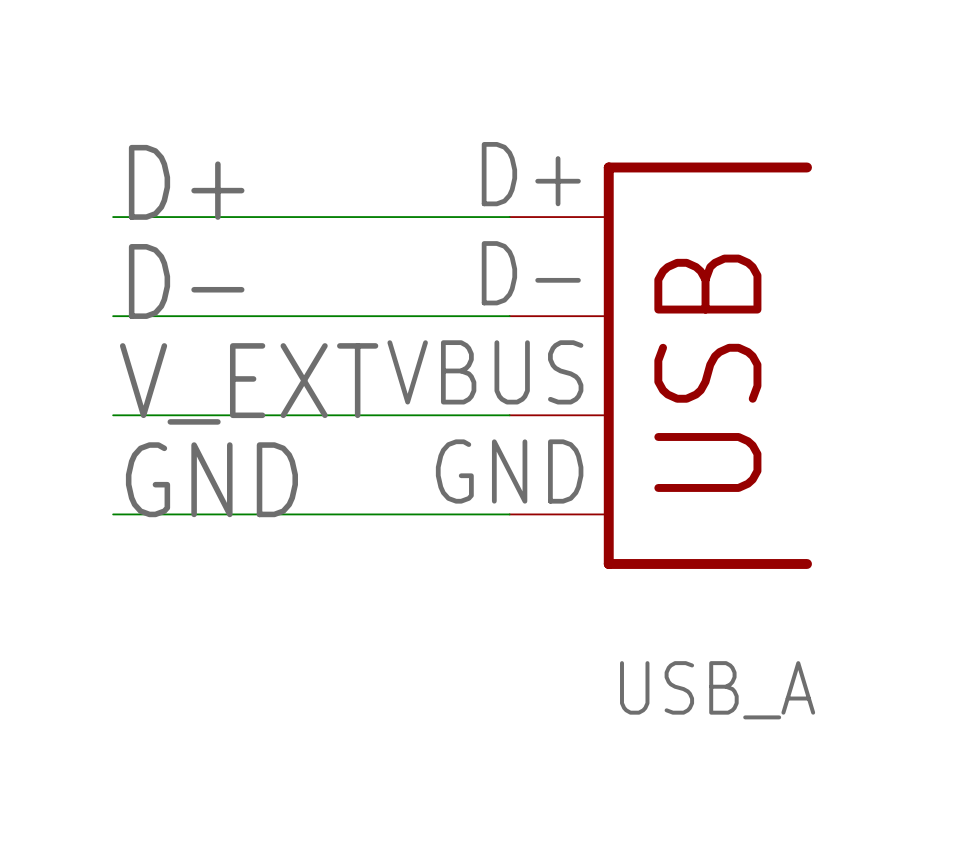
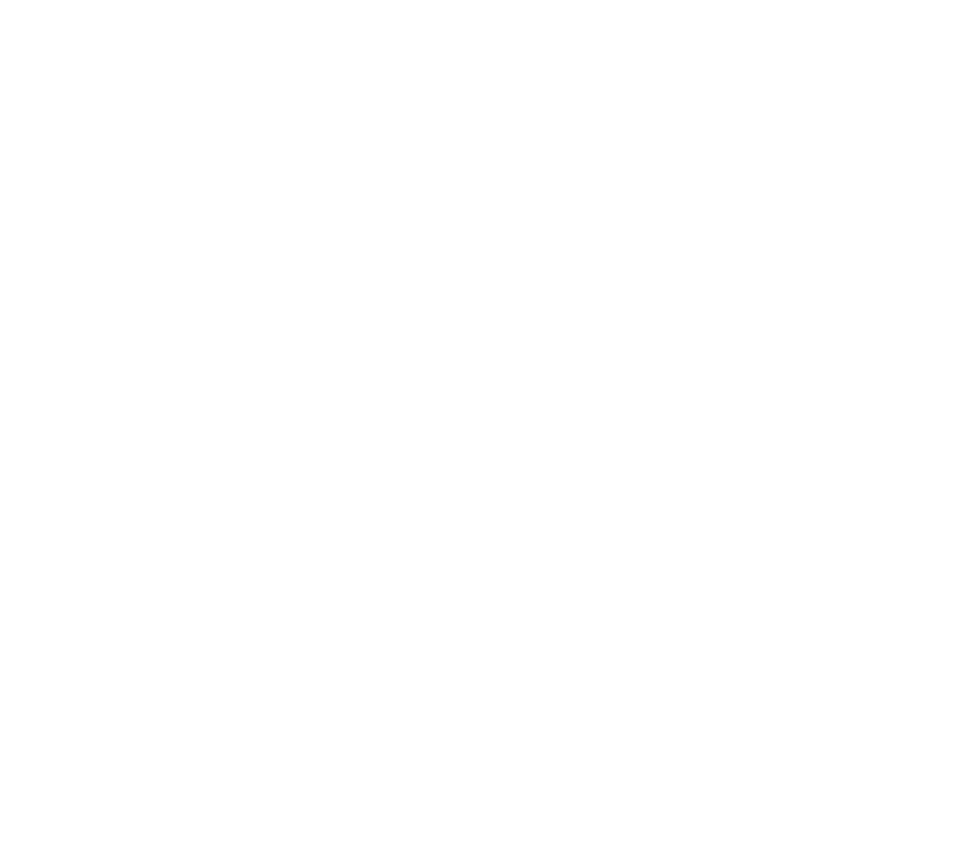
label: D+ (186, 182) -> none
wire: (113, 217) (509, 217) -> none
label: D- (186, 281) -> none
wire: (113, 316) (509, 316) -> none
USB_A: (660, 365) -> none
label: V_EXT (249, 383) -> none
wire: (113, 415) (509, 415) -> none
label: GND (211, 479) -> none
wire: (113, 514) (509, 514) -> none

